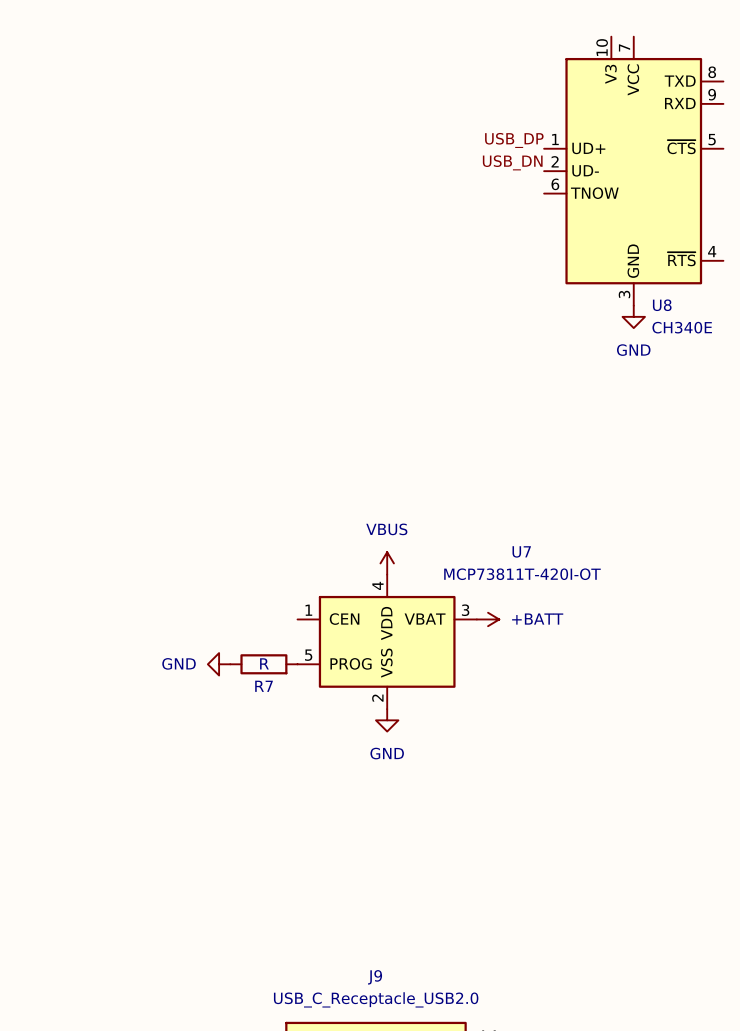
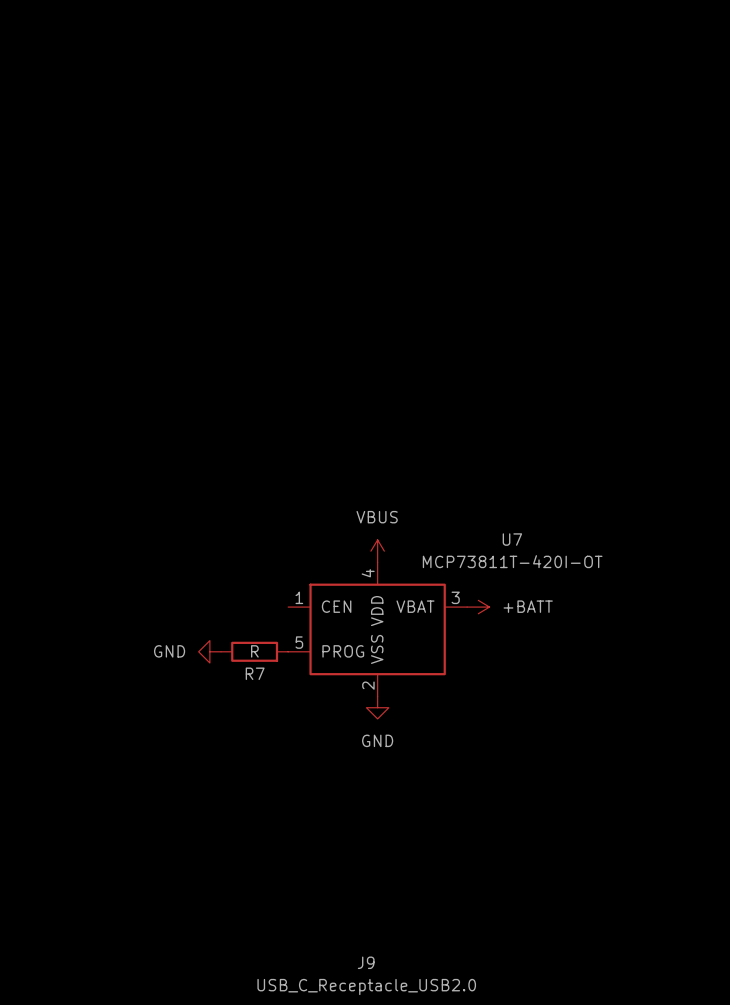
label: USB_DP (514, 140) -> none
label: USB_DN (512, 162) -> none
U8: CH340E (633, 171) -> none
power symbol: GND (633, 316) -> none

